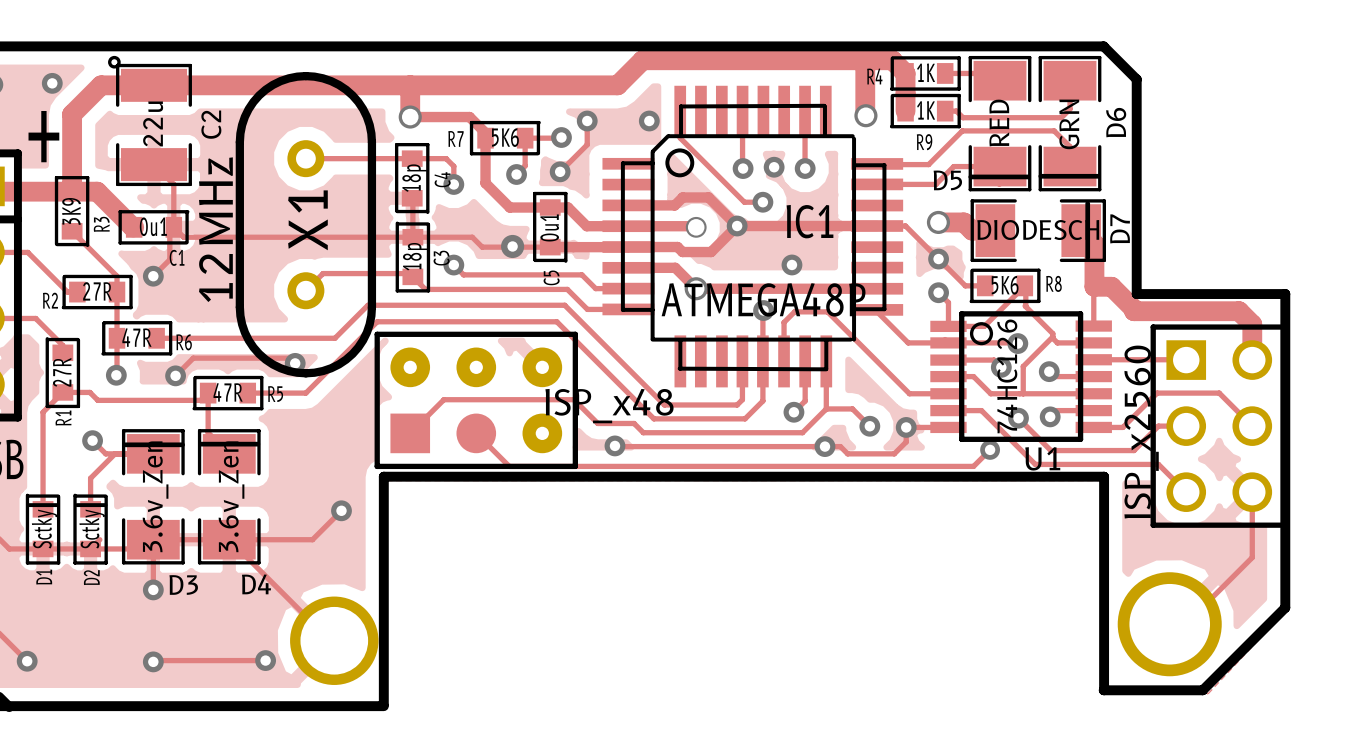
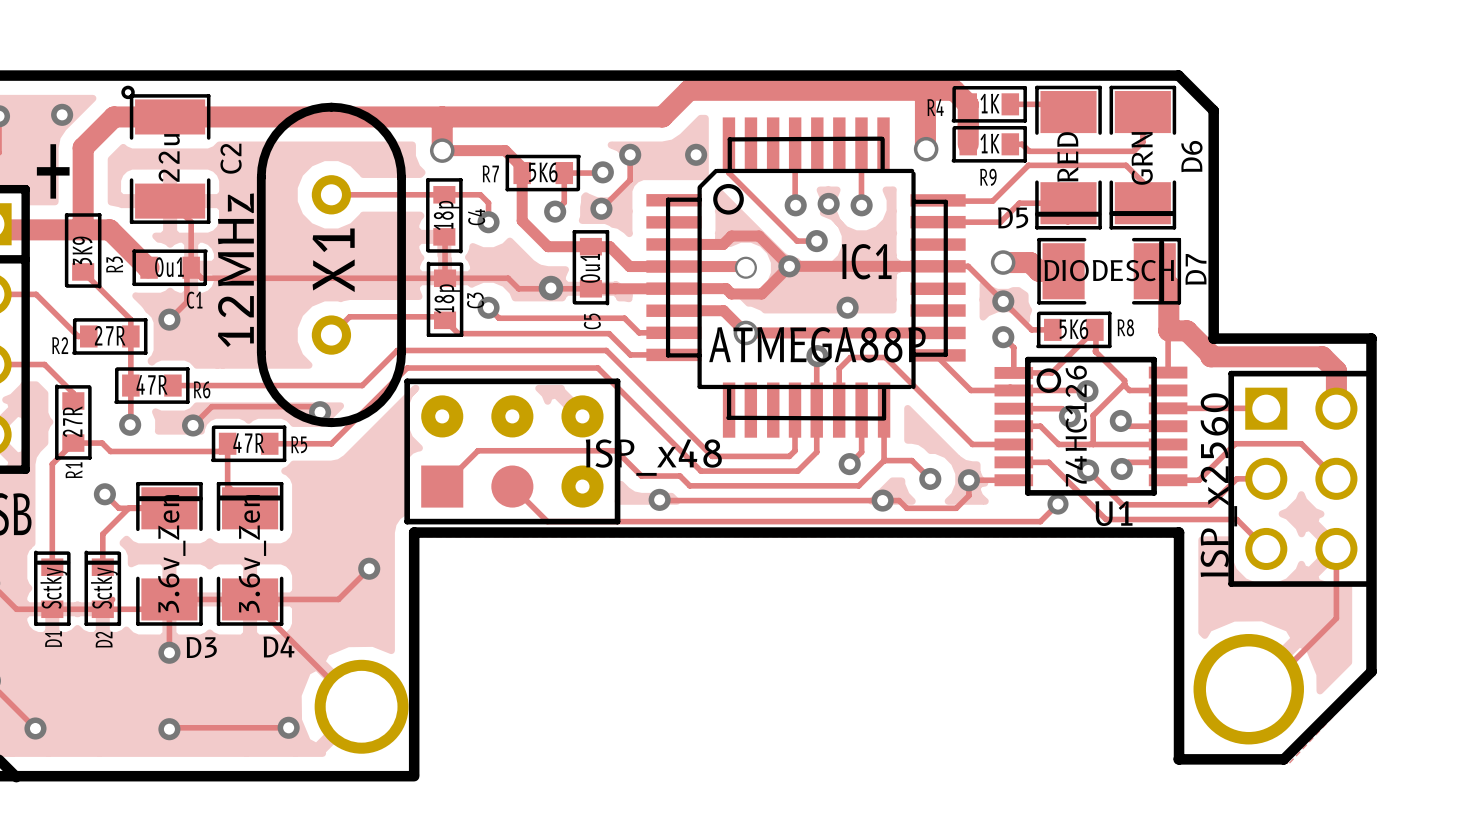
IC1 value: ATMEGA48P (763, 299) -> ATMEGA88P (817, 344)

